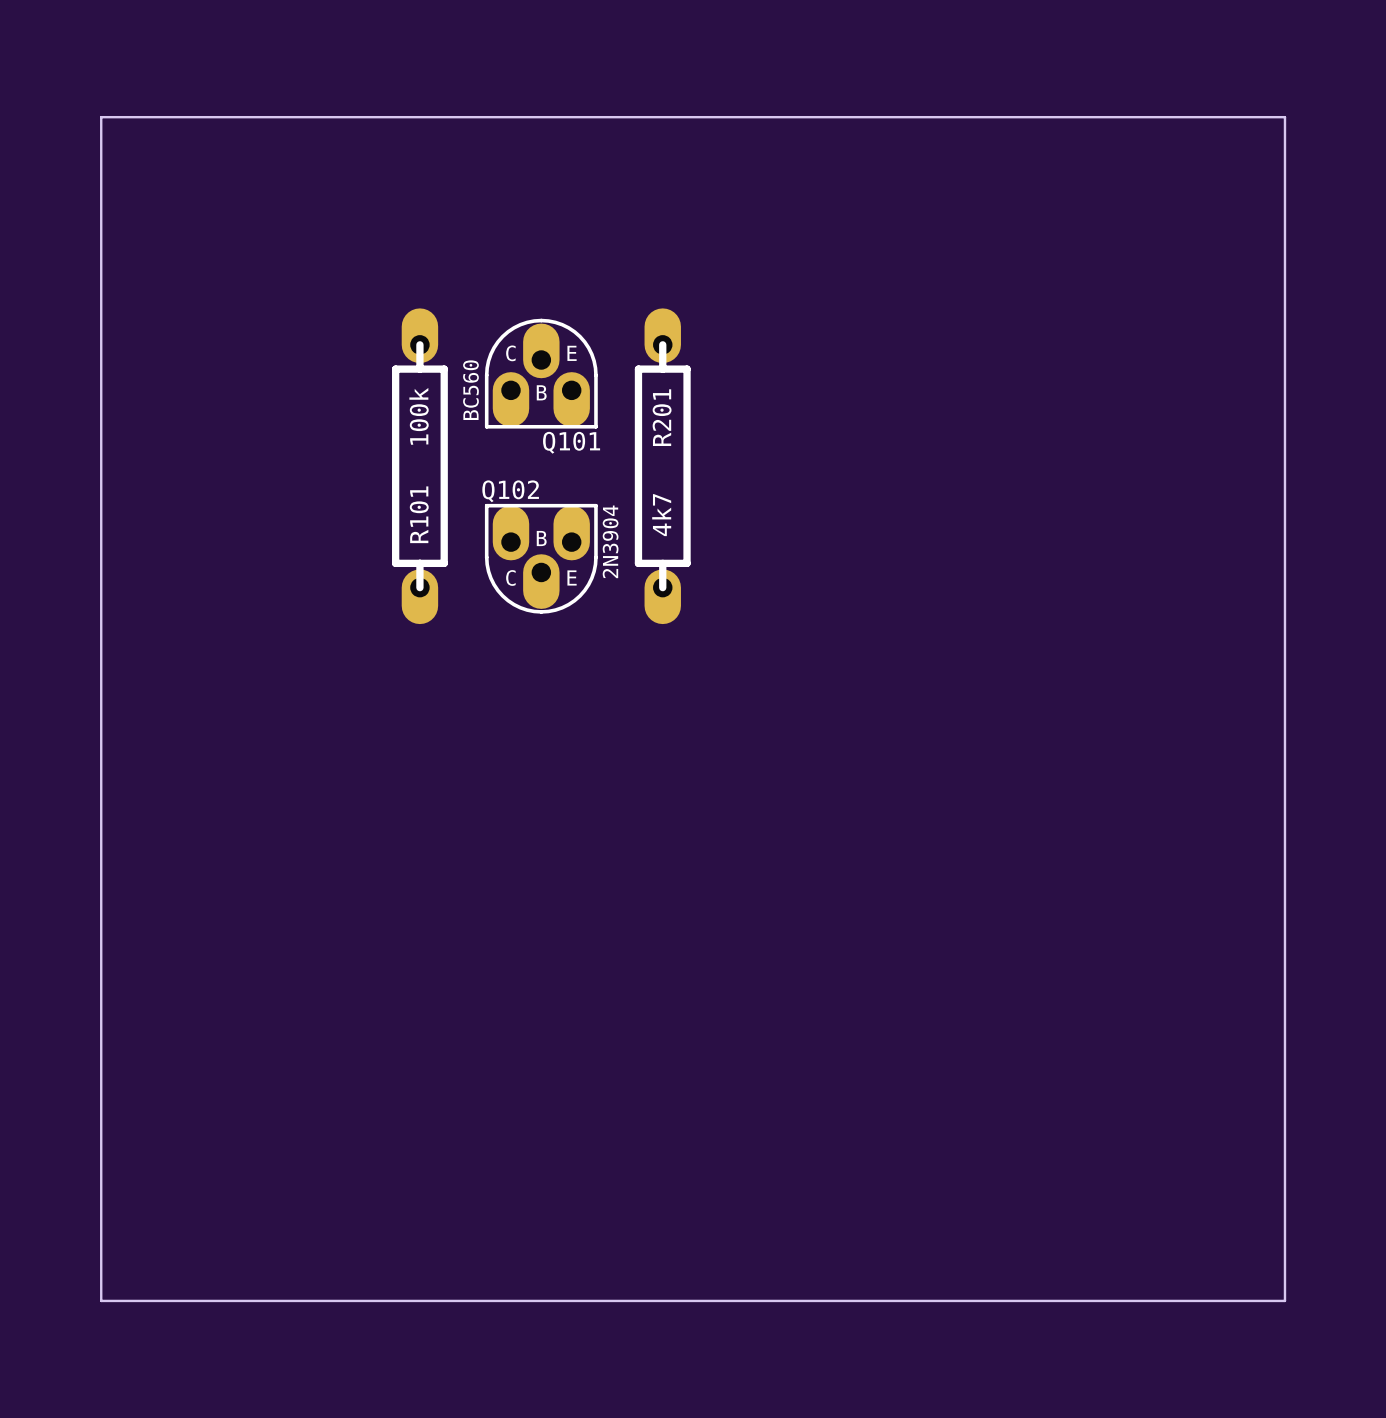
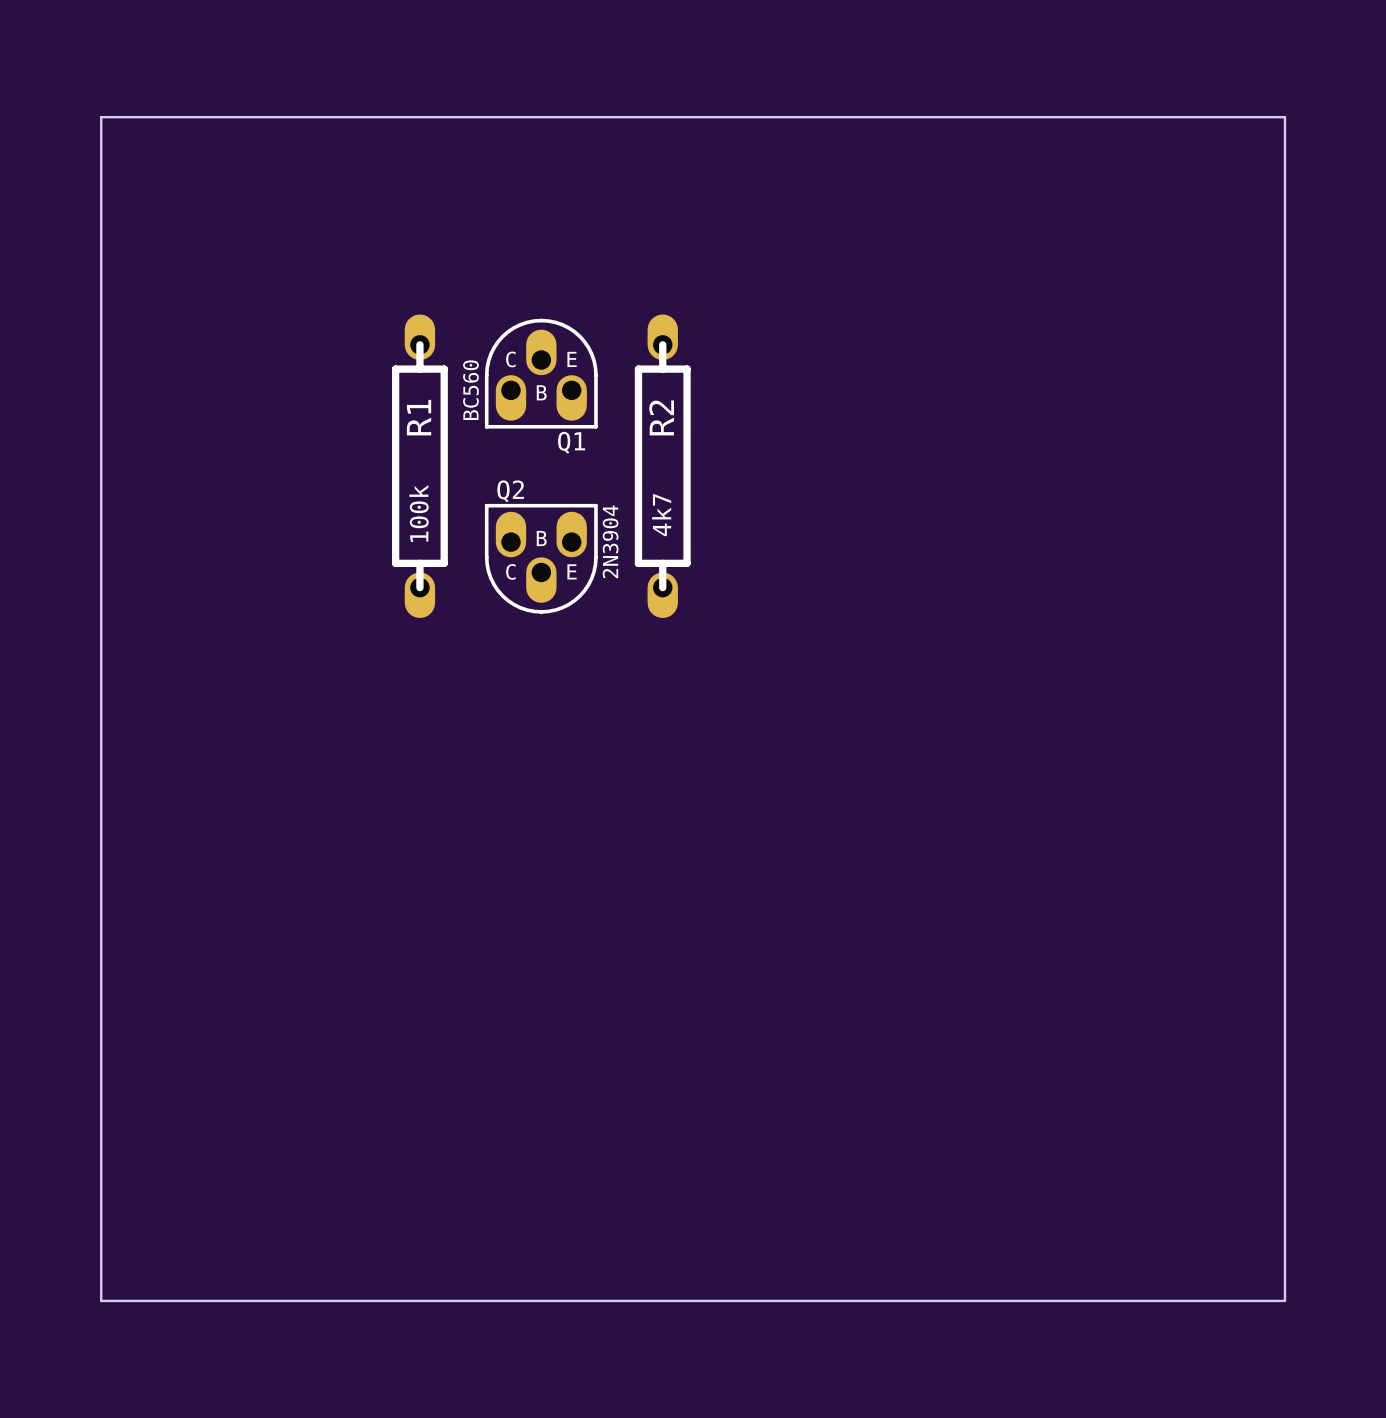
Q101: BC560 (541, 373) -> none
Q1: none -> BC560 (541, 373)
R101: 100k (419, 466) -> none
R1: none -> 100k (419, 466)
R201: 4k7 (662, 466) -> none
R2: none -> 4k7 (662, 466)
Q102: 2N3904 (541, 558) -> none
Q2: none -> 2N3904 (541, 558)

